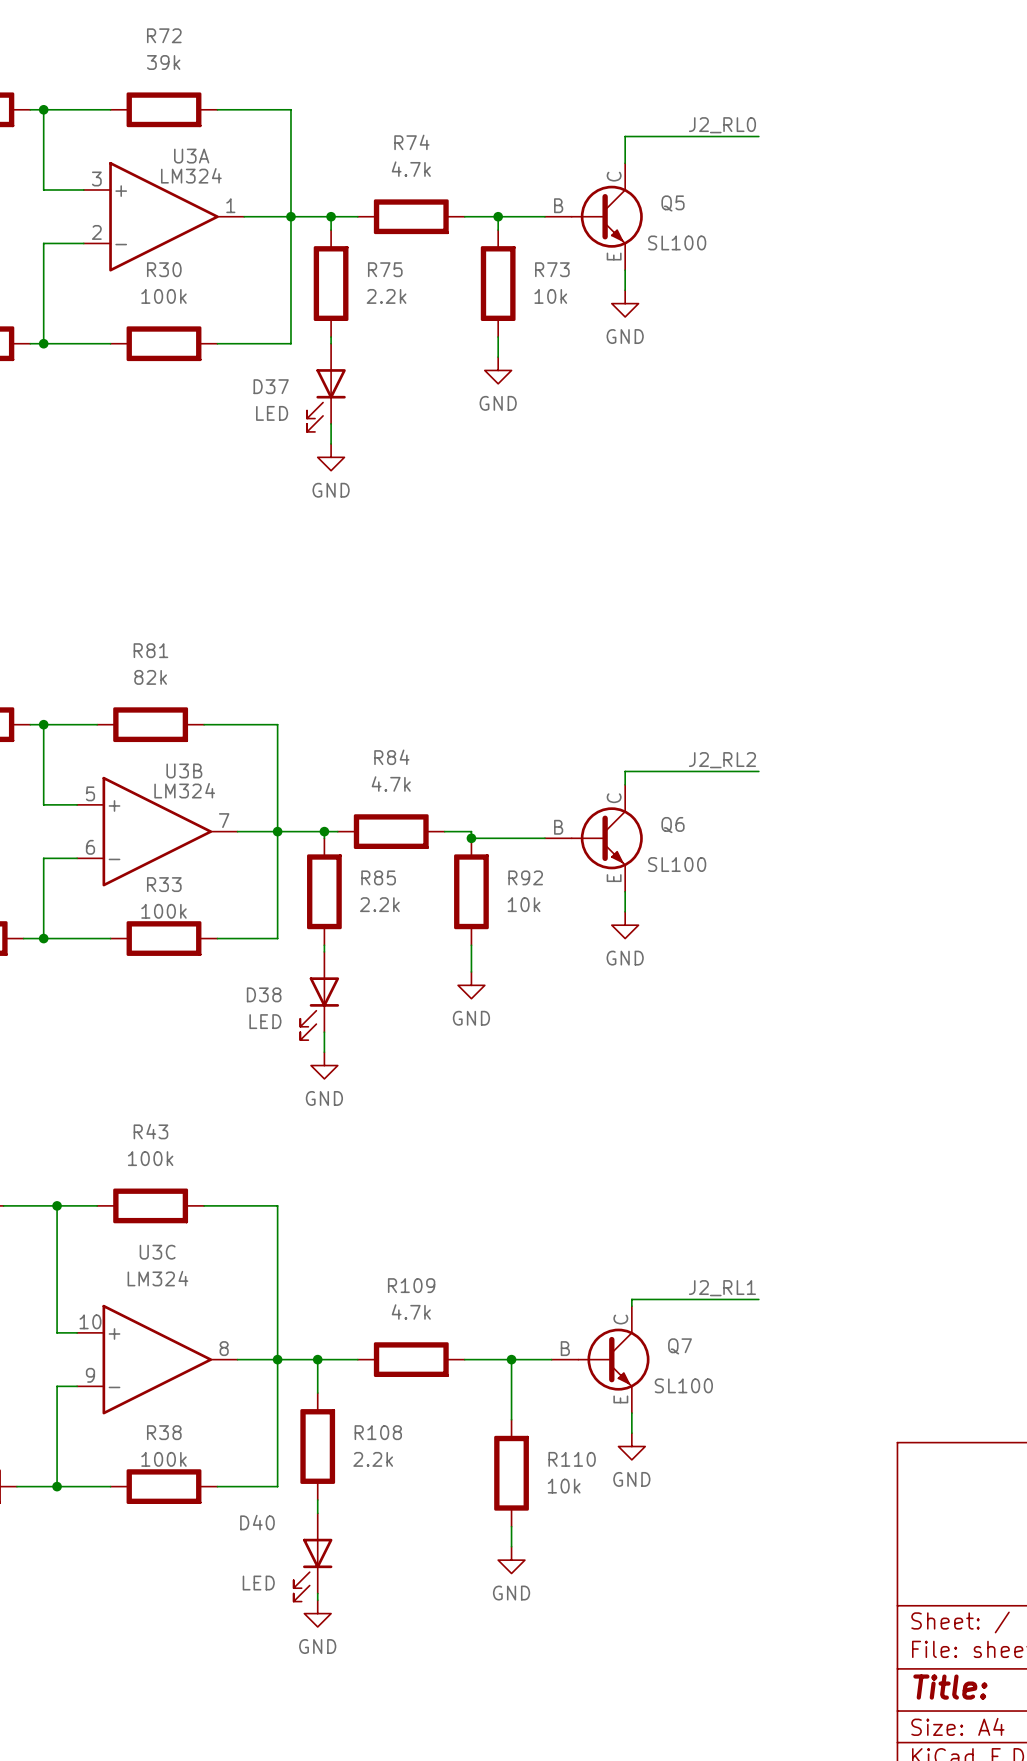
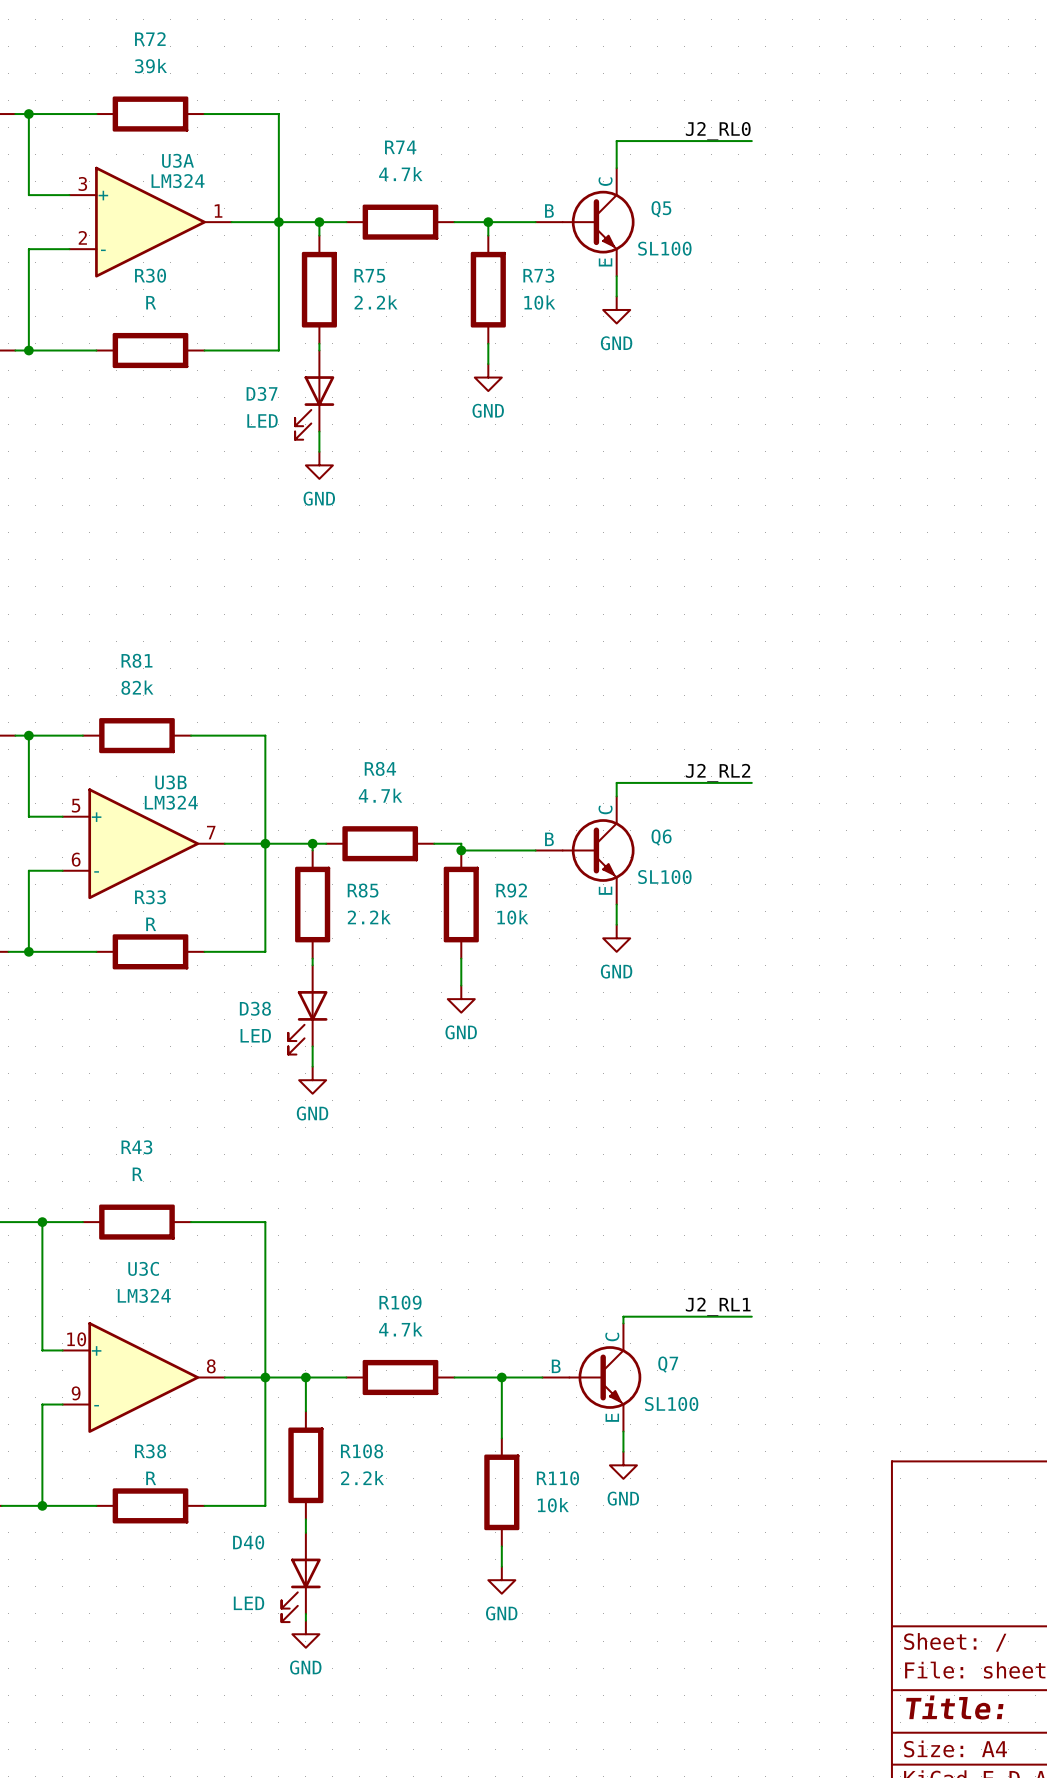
R30 value: 100k (164, 296) -> R (151, 302)
R33 value: 100k (164, 911) -> R (151, 924)
R43 value: 100k (150, 1158) -> R (137, 1174)
R38 value: 100k (164, 1459) -> R (151, 1478)

